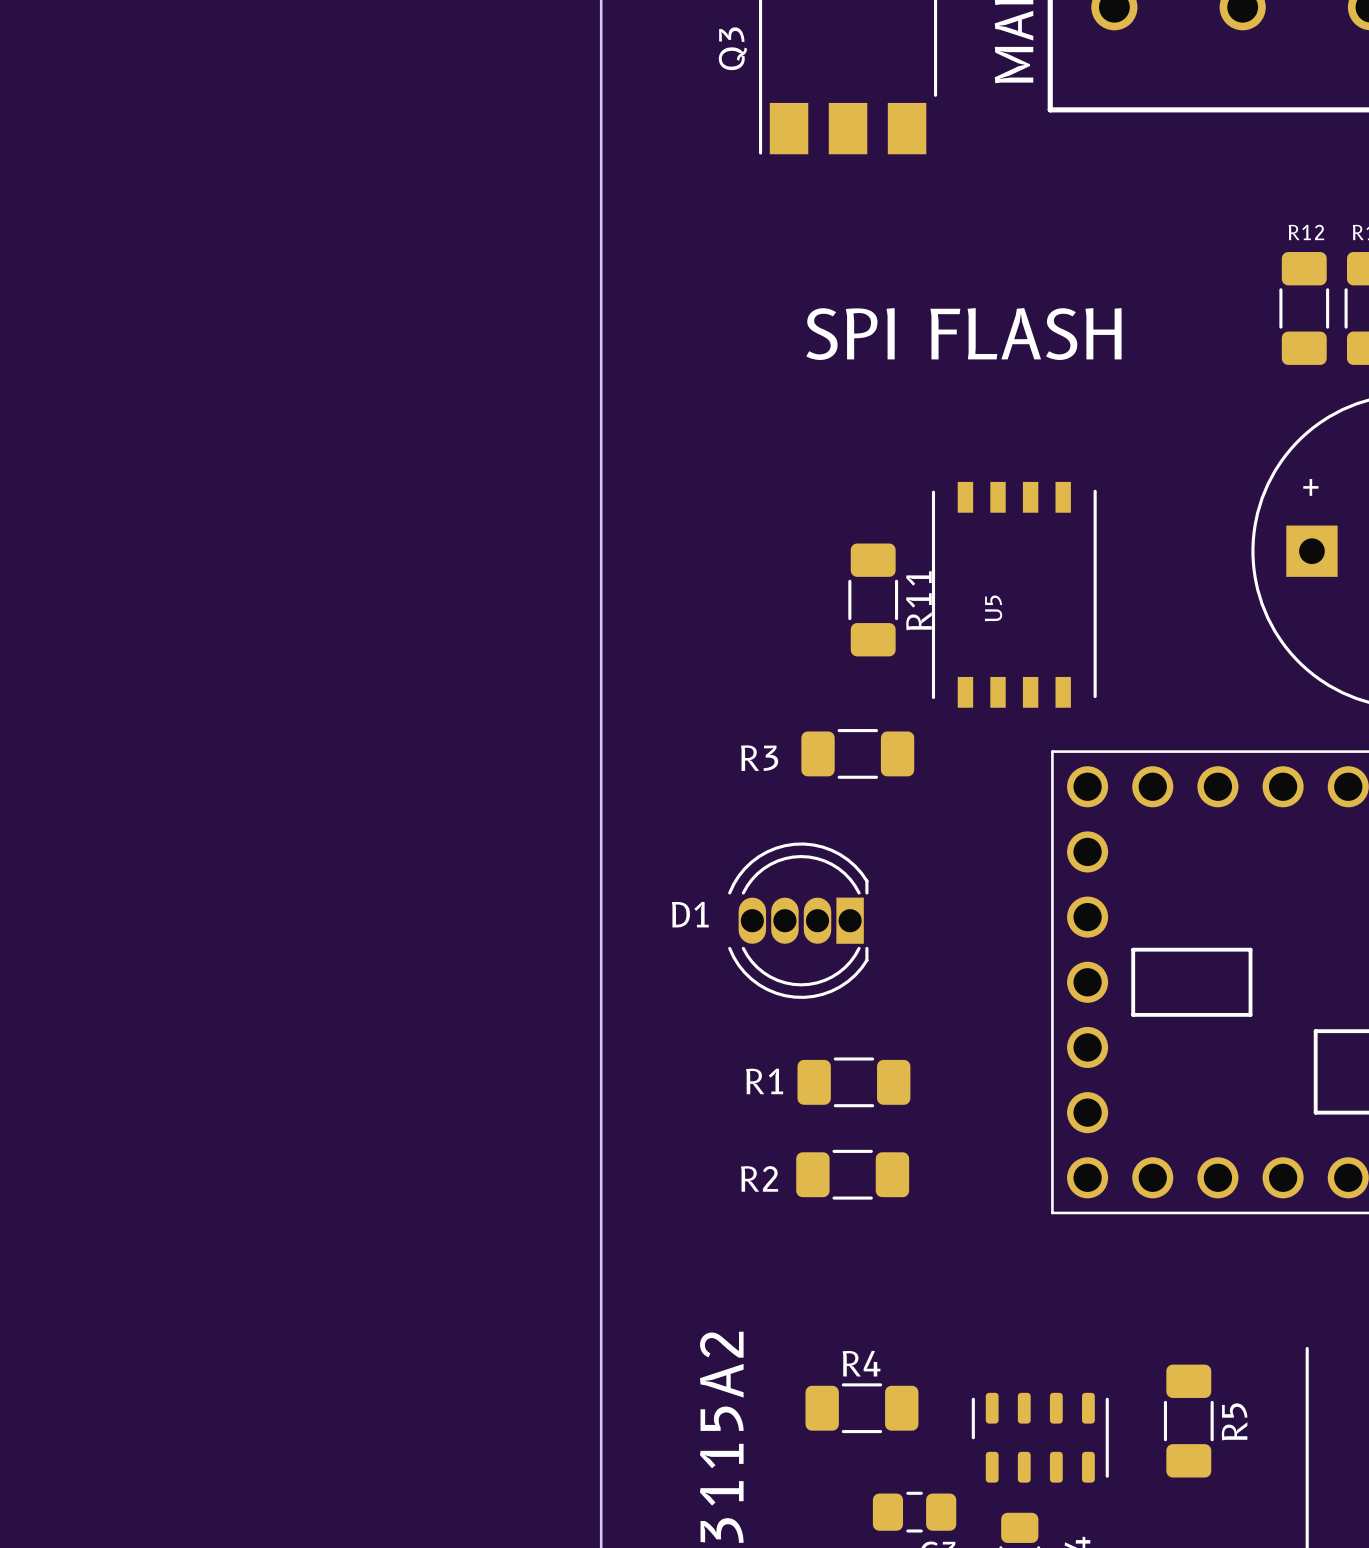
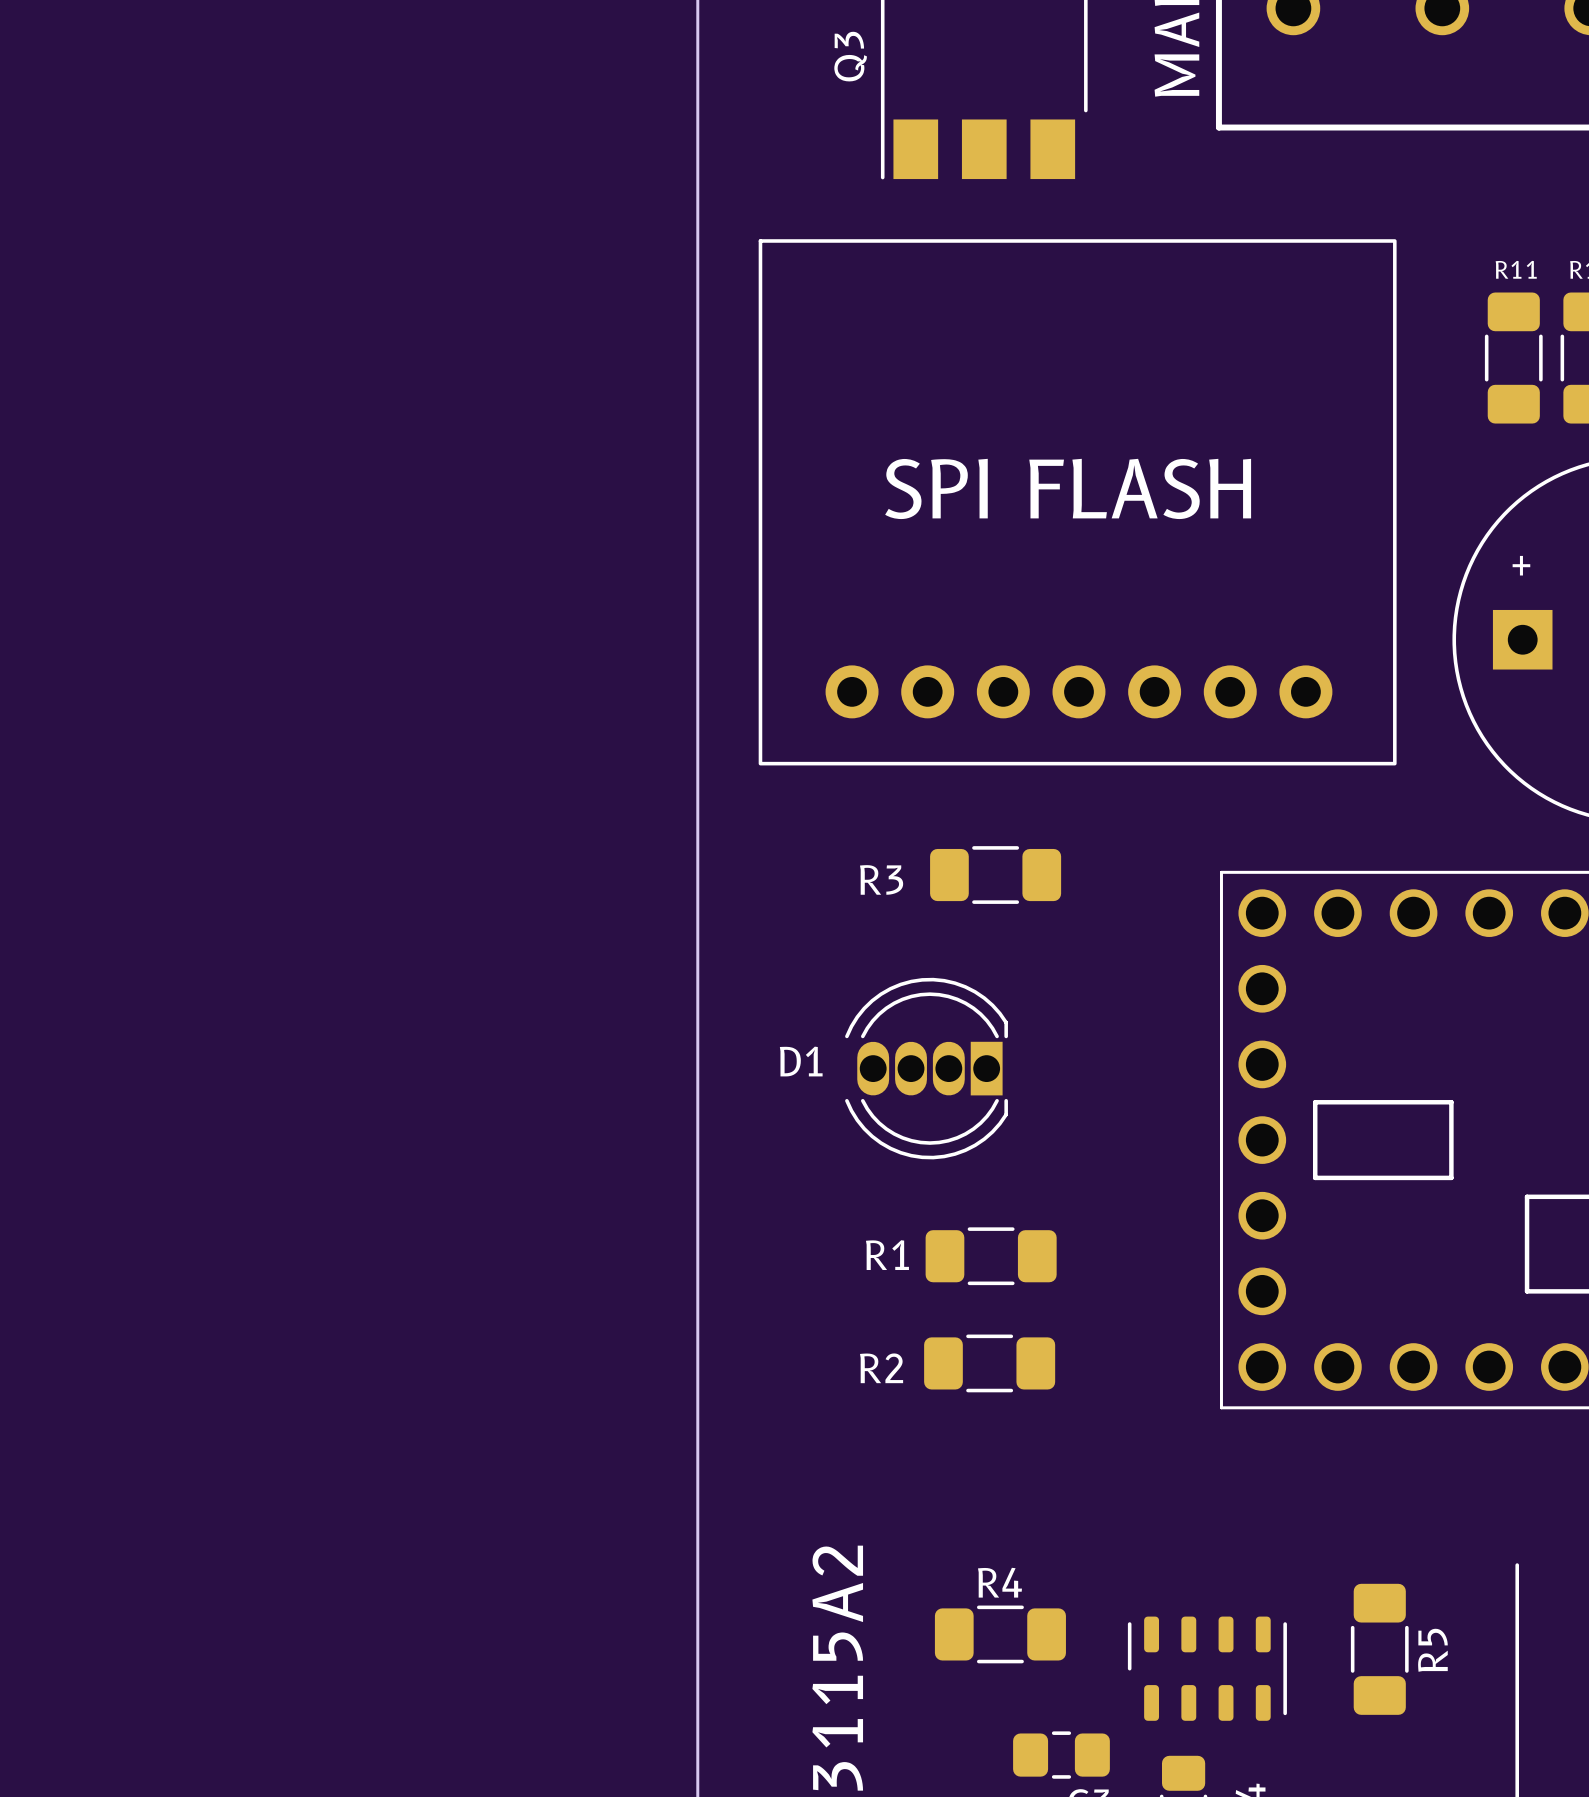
R12 name: R12 (1306, 232) -> R11 (1516, 269)
text position: SPI FLASH (963, 334) -> SPI FLASH (1068, 488)
part: none -> (1077, 502)
U5: (1014, 594) -> none
R11: (873, 599) -> none

